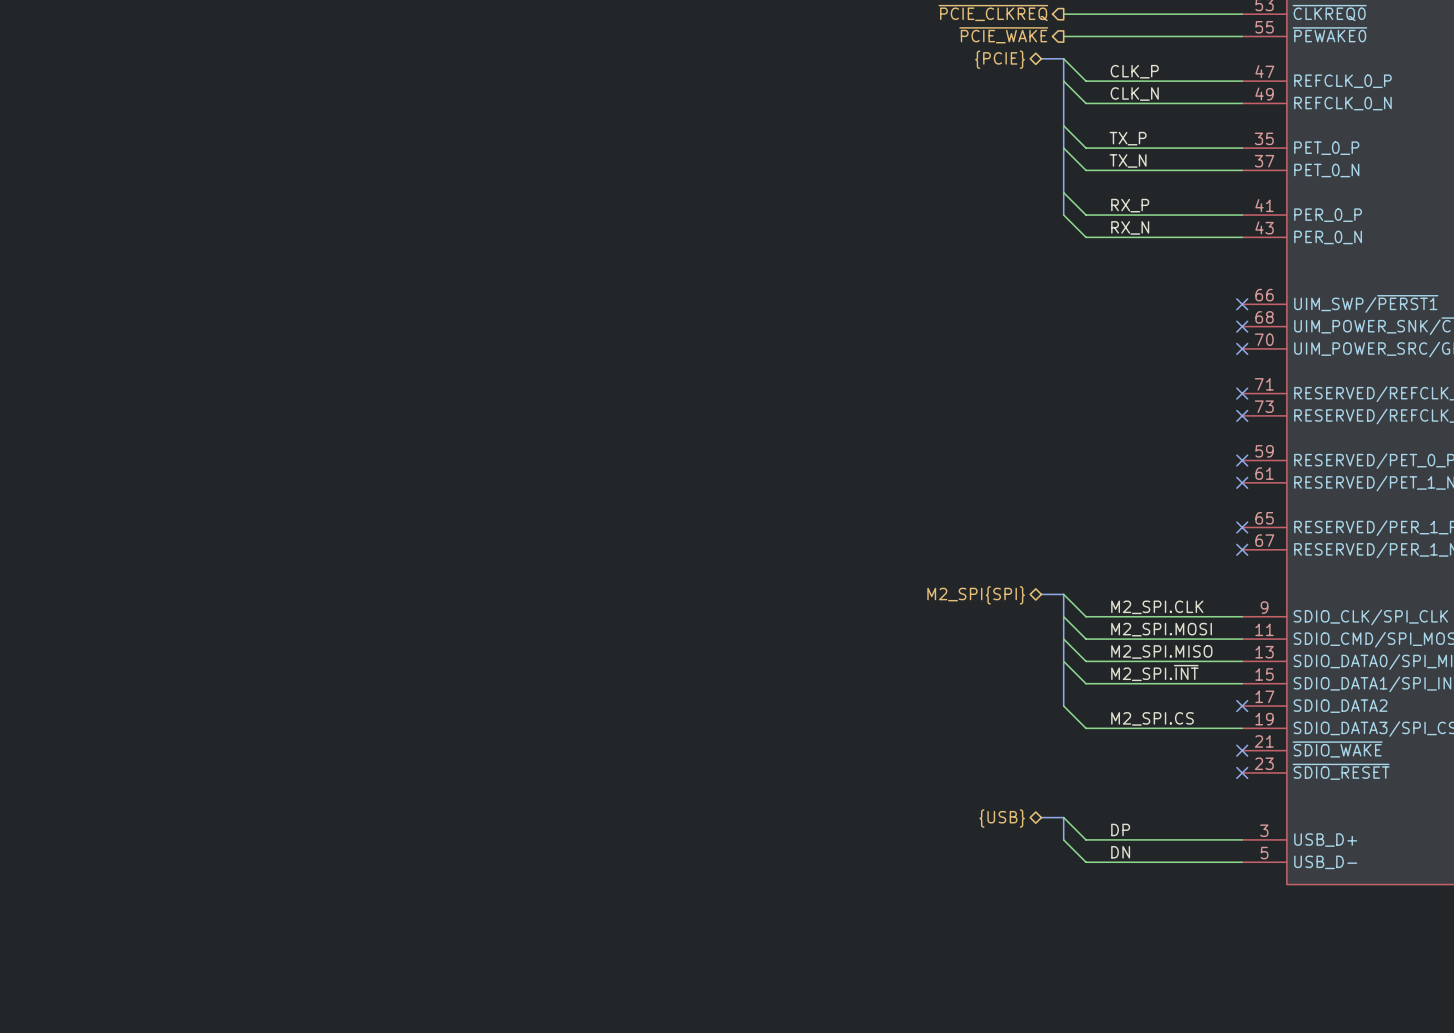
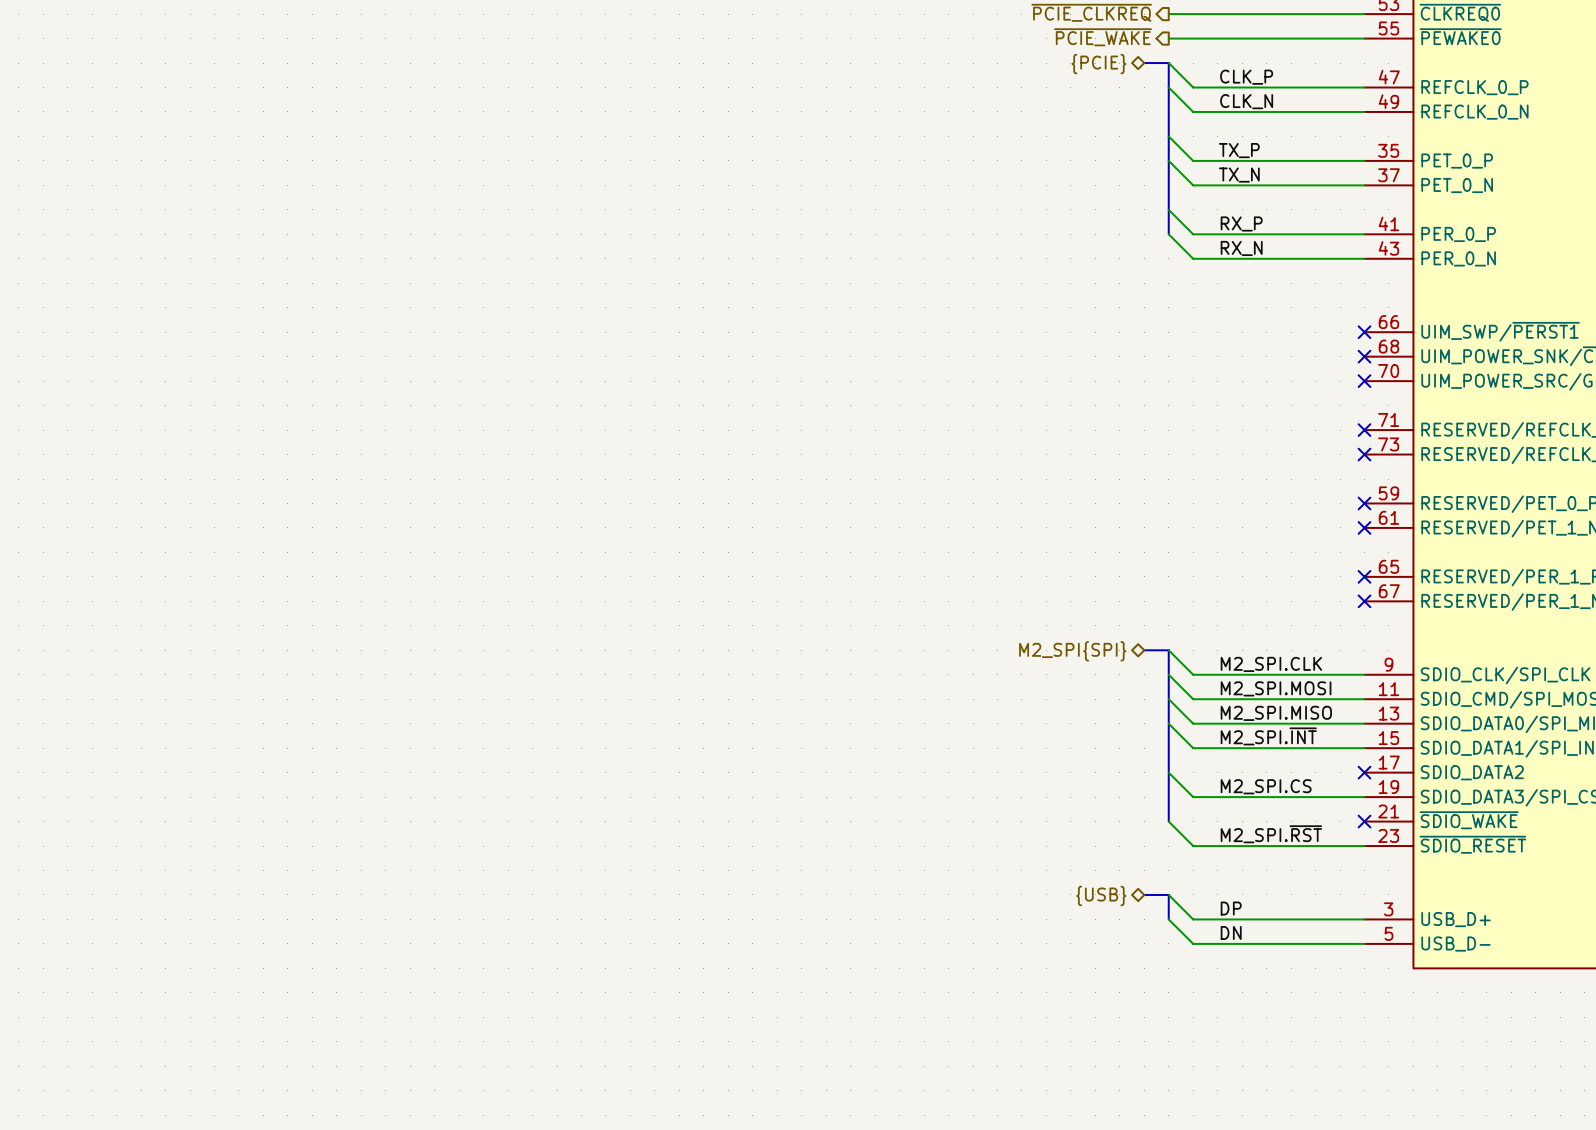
bus: none -> (1168, 772) (1168, 821)
wire: none -> (1168, 821) (1193, 846) (1364, 846)
label: none -> M2_SPI.~{RST} (1271, 834)
no-connect mark: (1242, 772) -> none

